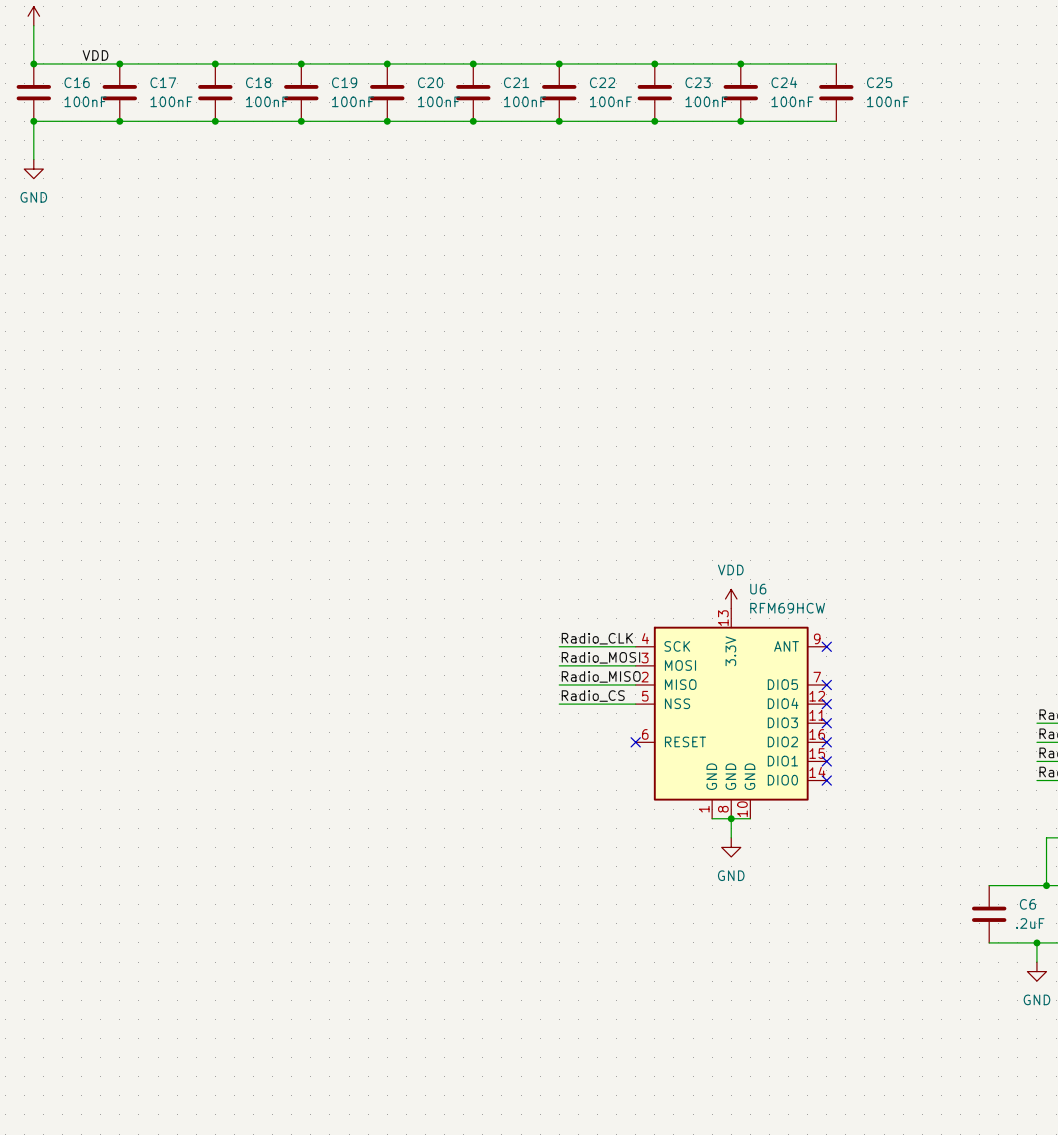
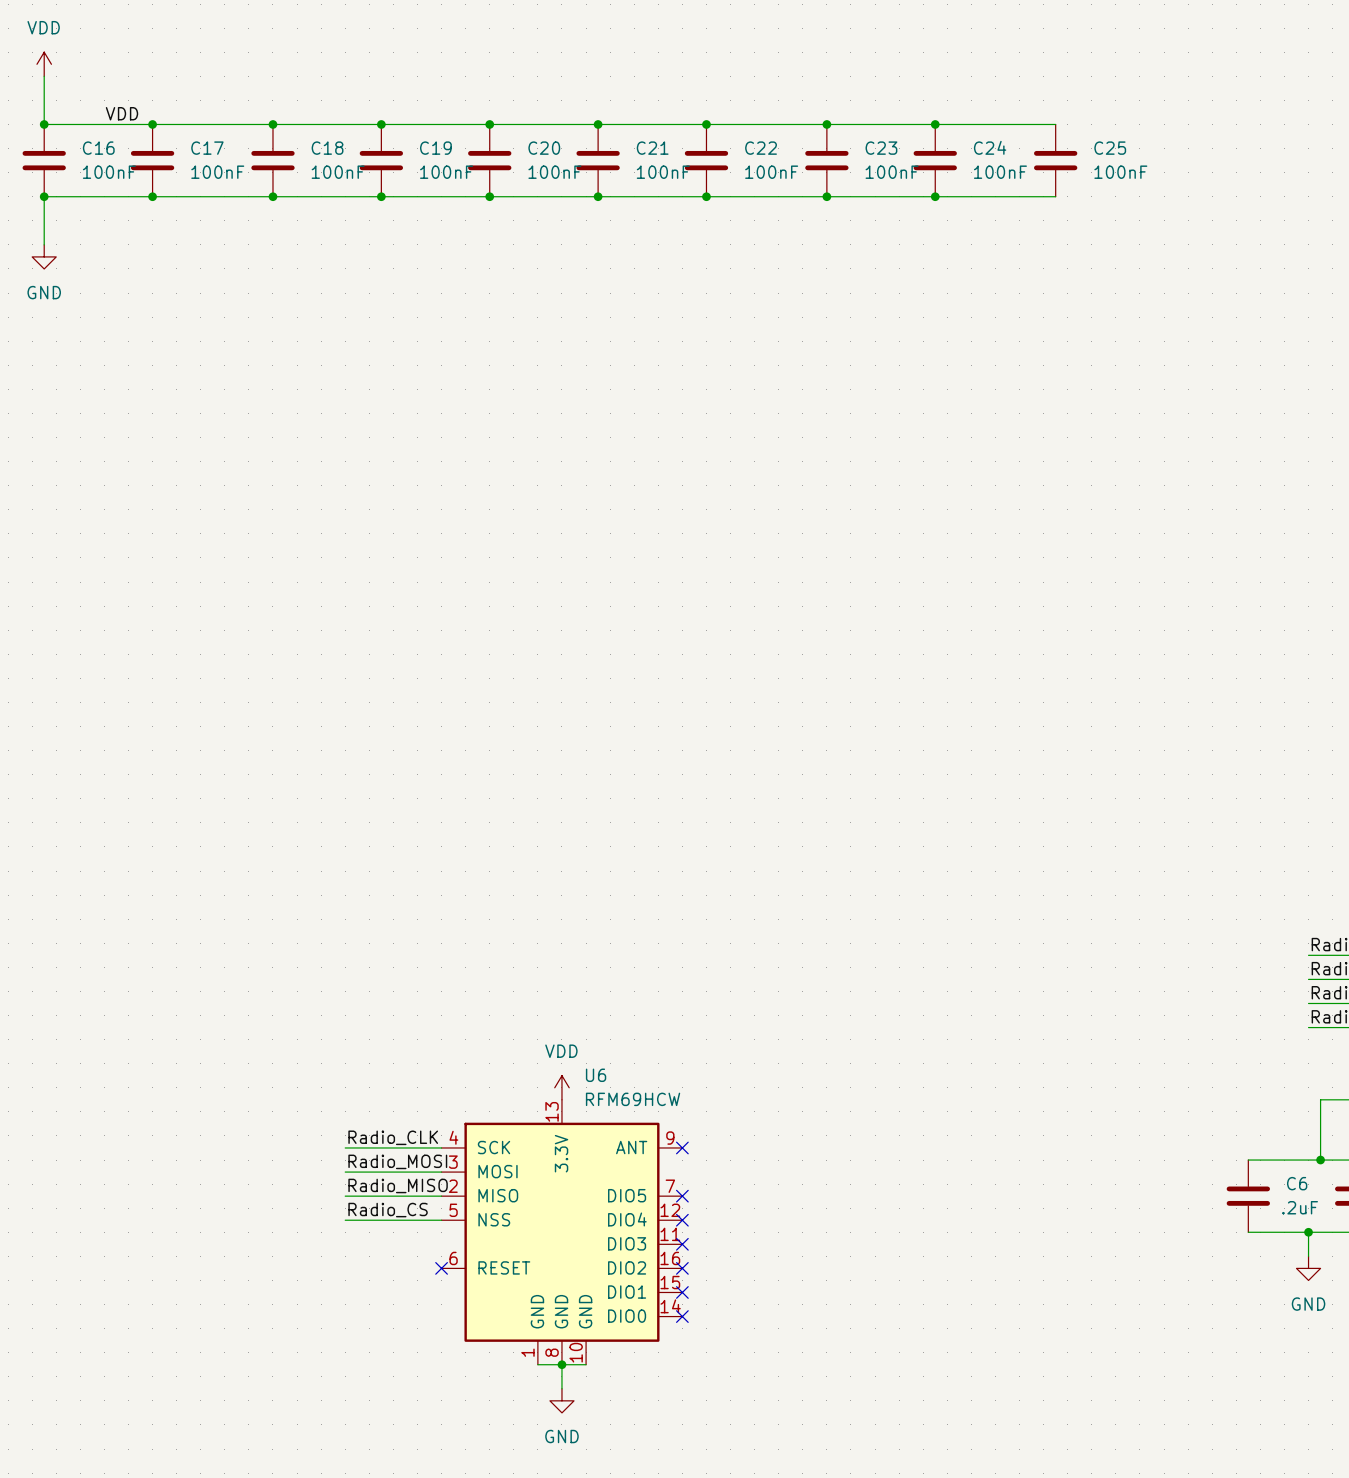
power symbol: VDD (731, 599) -> none
label: Radio_CLK (597, 638) -> none
wire: (559, 646) (635, 646) -> none
no-connect mark: (826, 646) -> none
label: Radio_MOSI (600, 657) -> none
wire: (559, 665) (635, 665) -> none
label: Radio_MISO (601, 676) -> none
wire: (559, 684) (635, 684) -> none
no-connect mark: (826, 684) -> none
label: Radio_CS (593, 696) -> none
wire: (559, 704) (635, 704) -> none
no-connect mark: (826, 704) -> none
U6 position: (731, 713) -> (561, 1232)
no-connect mark: (826, 723) -> none
no-connect mark: (635, 742) -> none
no-connect mark: (826, 742) -> none
no-connect mark: (826, 761) -> none
no-connect mark: (826, 780) -> none
wire: (712, 818) (750, 818) -> none
wire: (731, 818) (731, 837) -> none
junction: (731, 818) -> none
power symbol: none -> VDD (561, 1087)
power symbol: GND (731, 847) -> none
label: none -> Radio_CLK (393, 1137)
wire: none -> (345, 1147) (441, 1147)
no-connect mark: none -> (682, 1147)
label: none -> Radio_MOSI (397, 1161)
wire: none -> (345, 1172) (441, 1172)
label: none -> Radio_MISO (398, 1185)
wire: none -> (345, 1196) (441, 1196)
no-connect mark: none -> (682, 1196)
label: none -> Radio_CS (388, 1210)
wire: none -> (345, 1220) (441, 1220)
no-connect mark: none -> (682, 1220)
no-connect mark: none -> (682, 1244)
no-connect mark: none -> (441, 1268)
no-connect mark: none -> (682, 1268)
no-connect mark: none -> (682, 1292)
no-connect mark: none -> (682, 1316)
wire: none -> (537, 1364) (586, 1364)
wire: none -> (561, 1364) (561, 1388)
junction: none -> (561, 1364)
power symbol: none -> GND (561, 1400)

